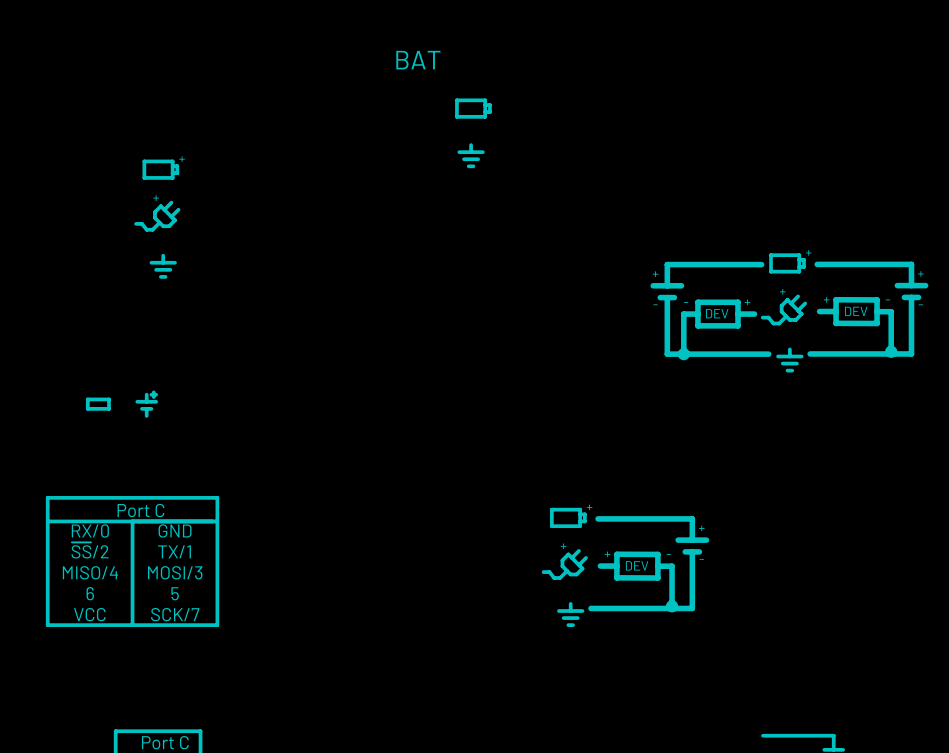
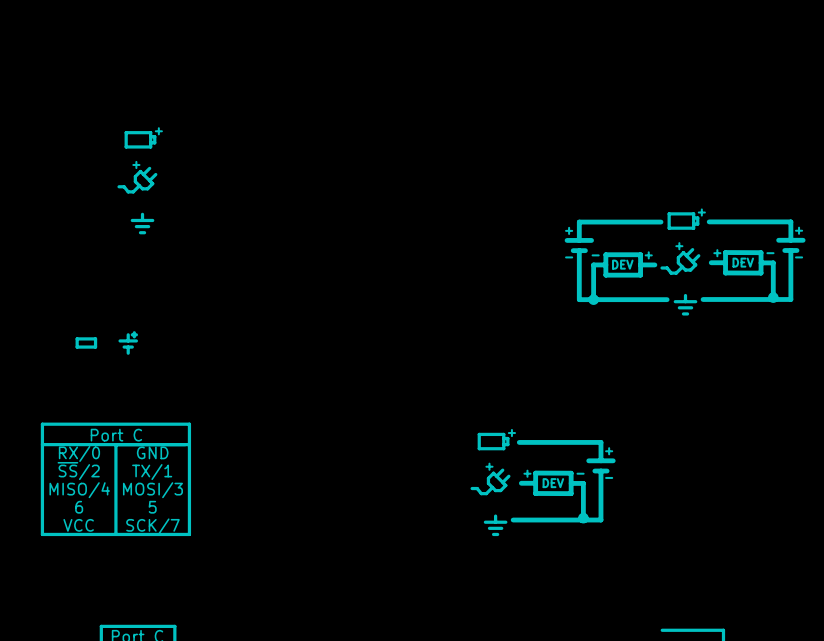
text: BAT (418, 60) -> none
line: (456, 100) (485, 100) (485, 116) (456, 116) (456, 100) -> none
line: (485, 105) (489, 105) (489, 112) (485, 112) -> none
line: (471, 145) (471, 152) -> none
line: (459, 152) (482, 152) -> none
line: (464, 159) (478, 159) -> none
line: (468, 166) (473, 166) -> none

